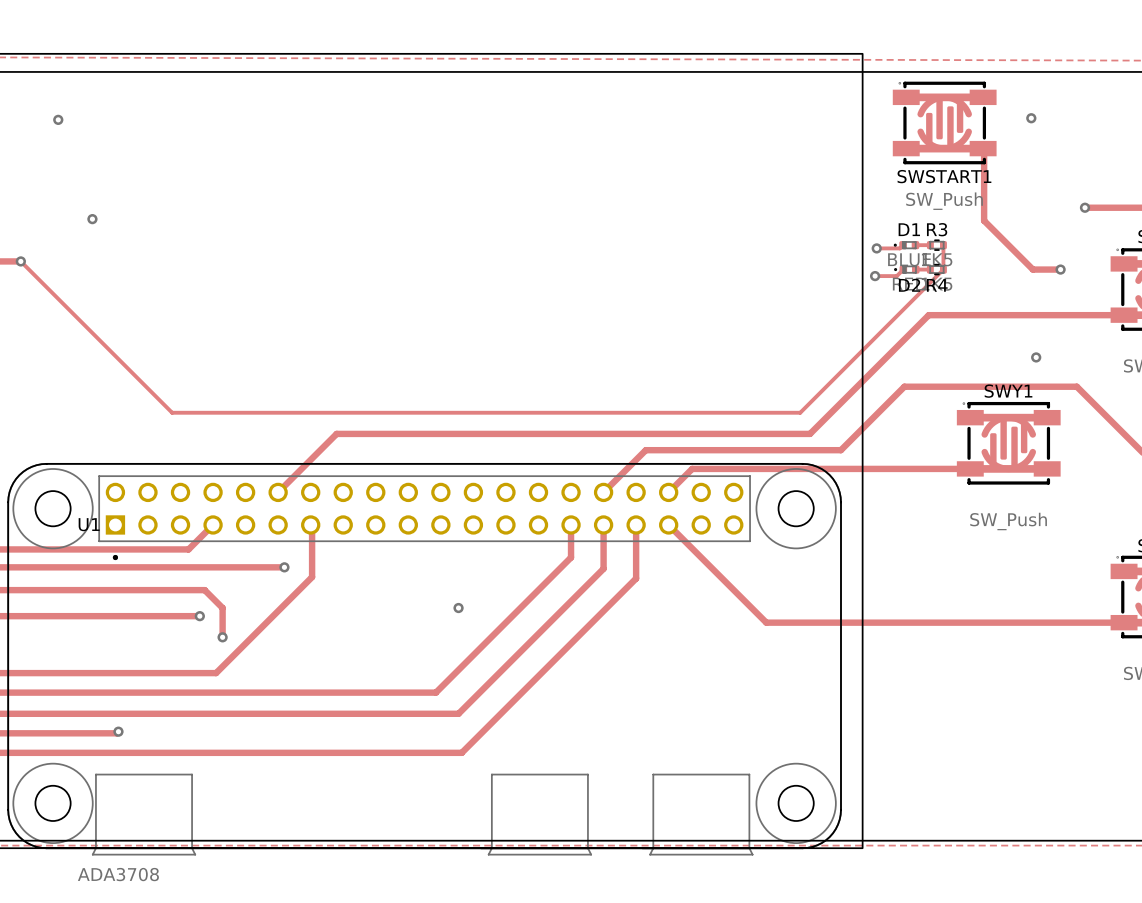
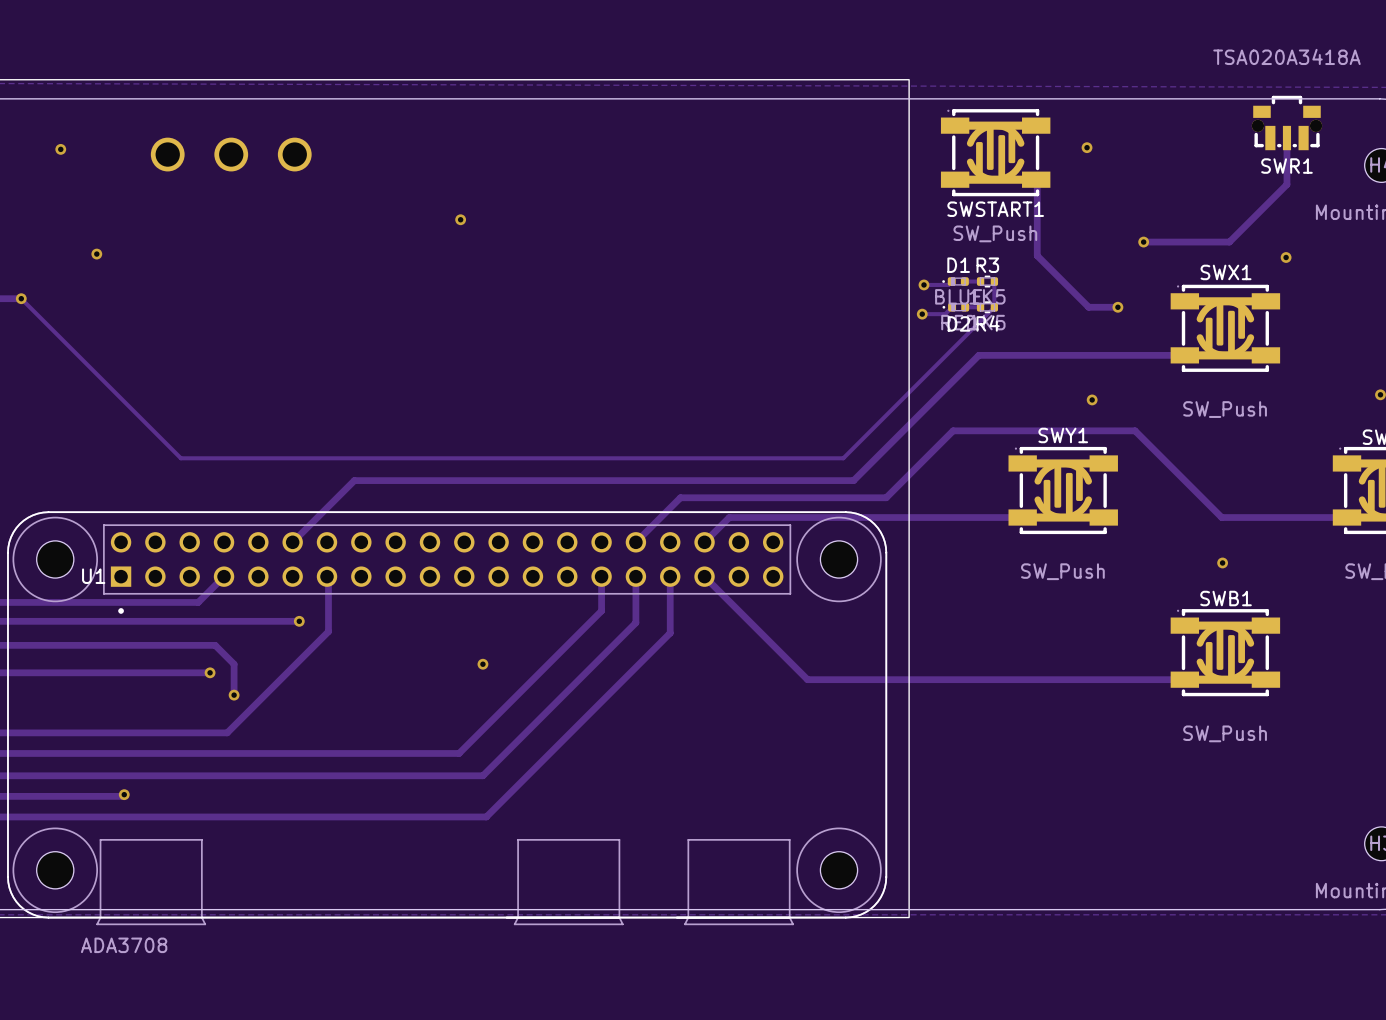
part: none -> (231, 154)
via: none -> (460, 219)

